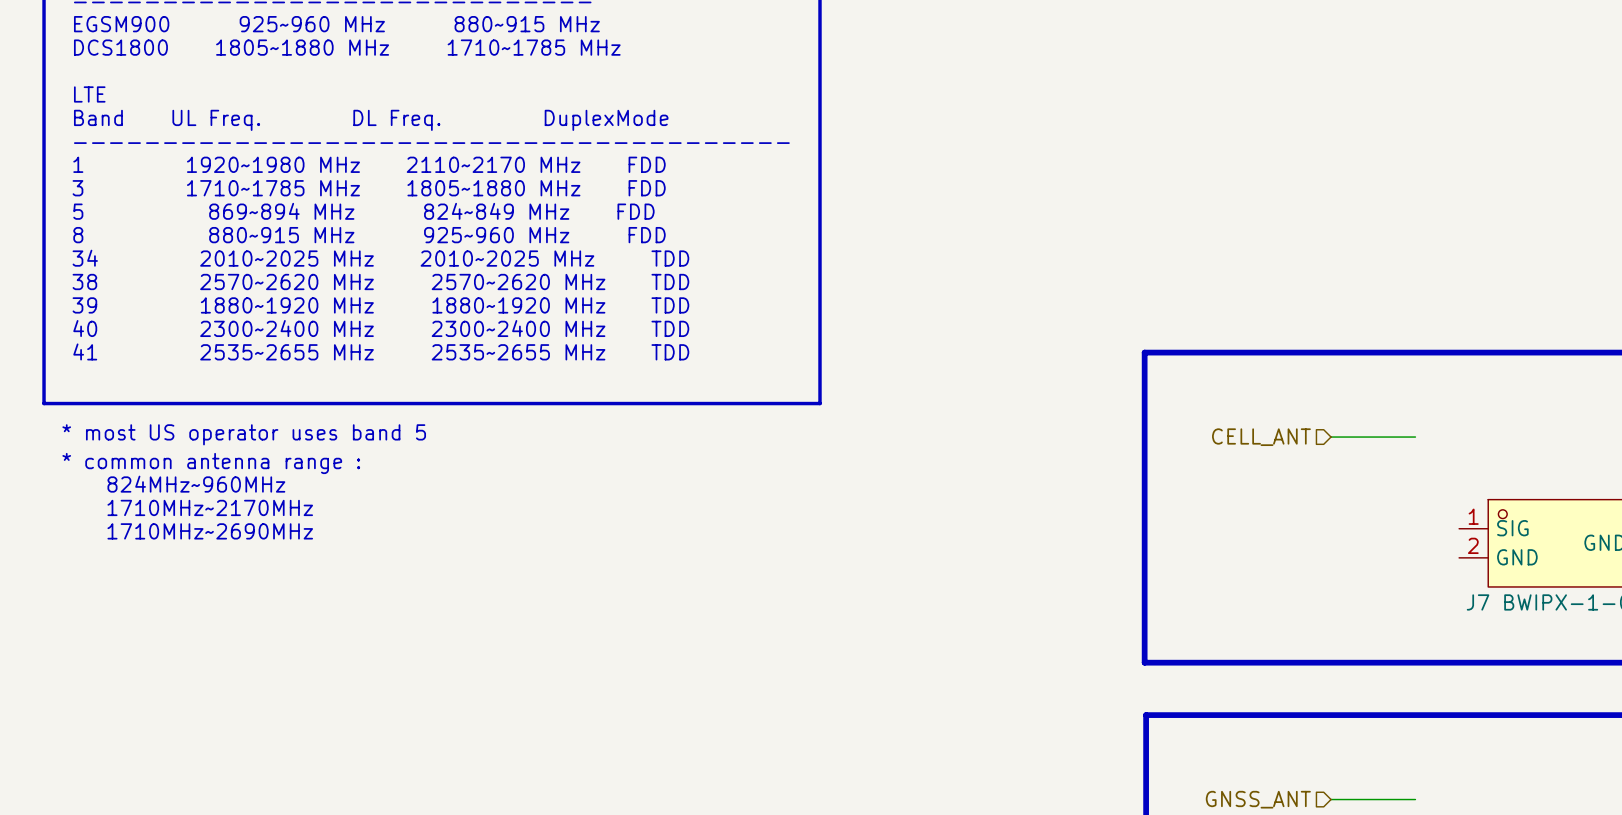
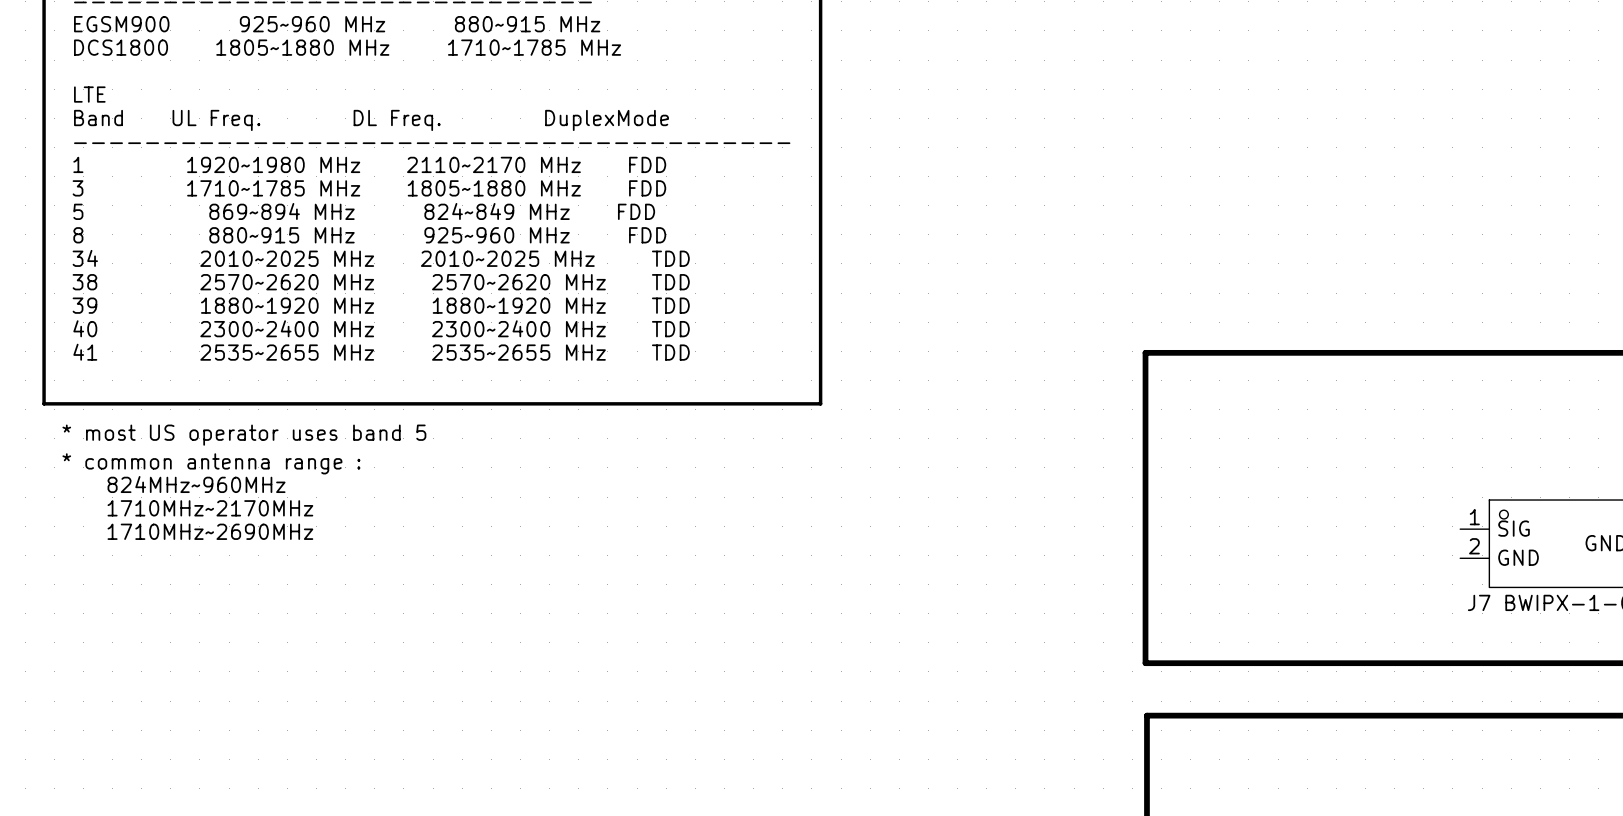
hierarchical label: CELL_ANT (1261, 437) -> none
wire: (1331, 437) (1415, 437) -> none
hierarchical label: GNSS_ANT (1258, 799) -> none
wire: (1331, 799) (1415, 799) -> none

